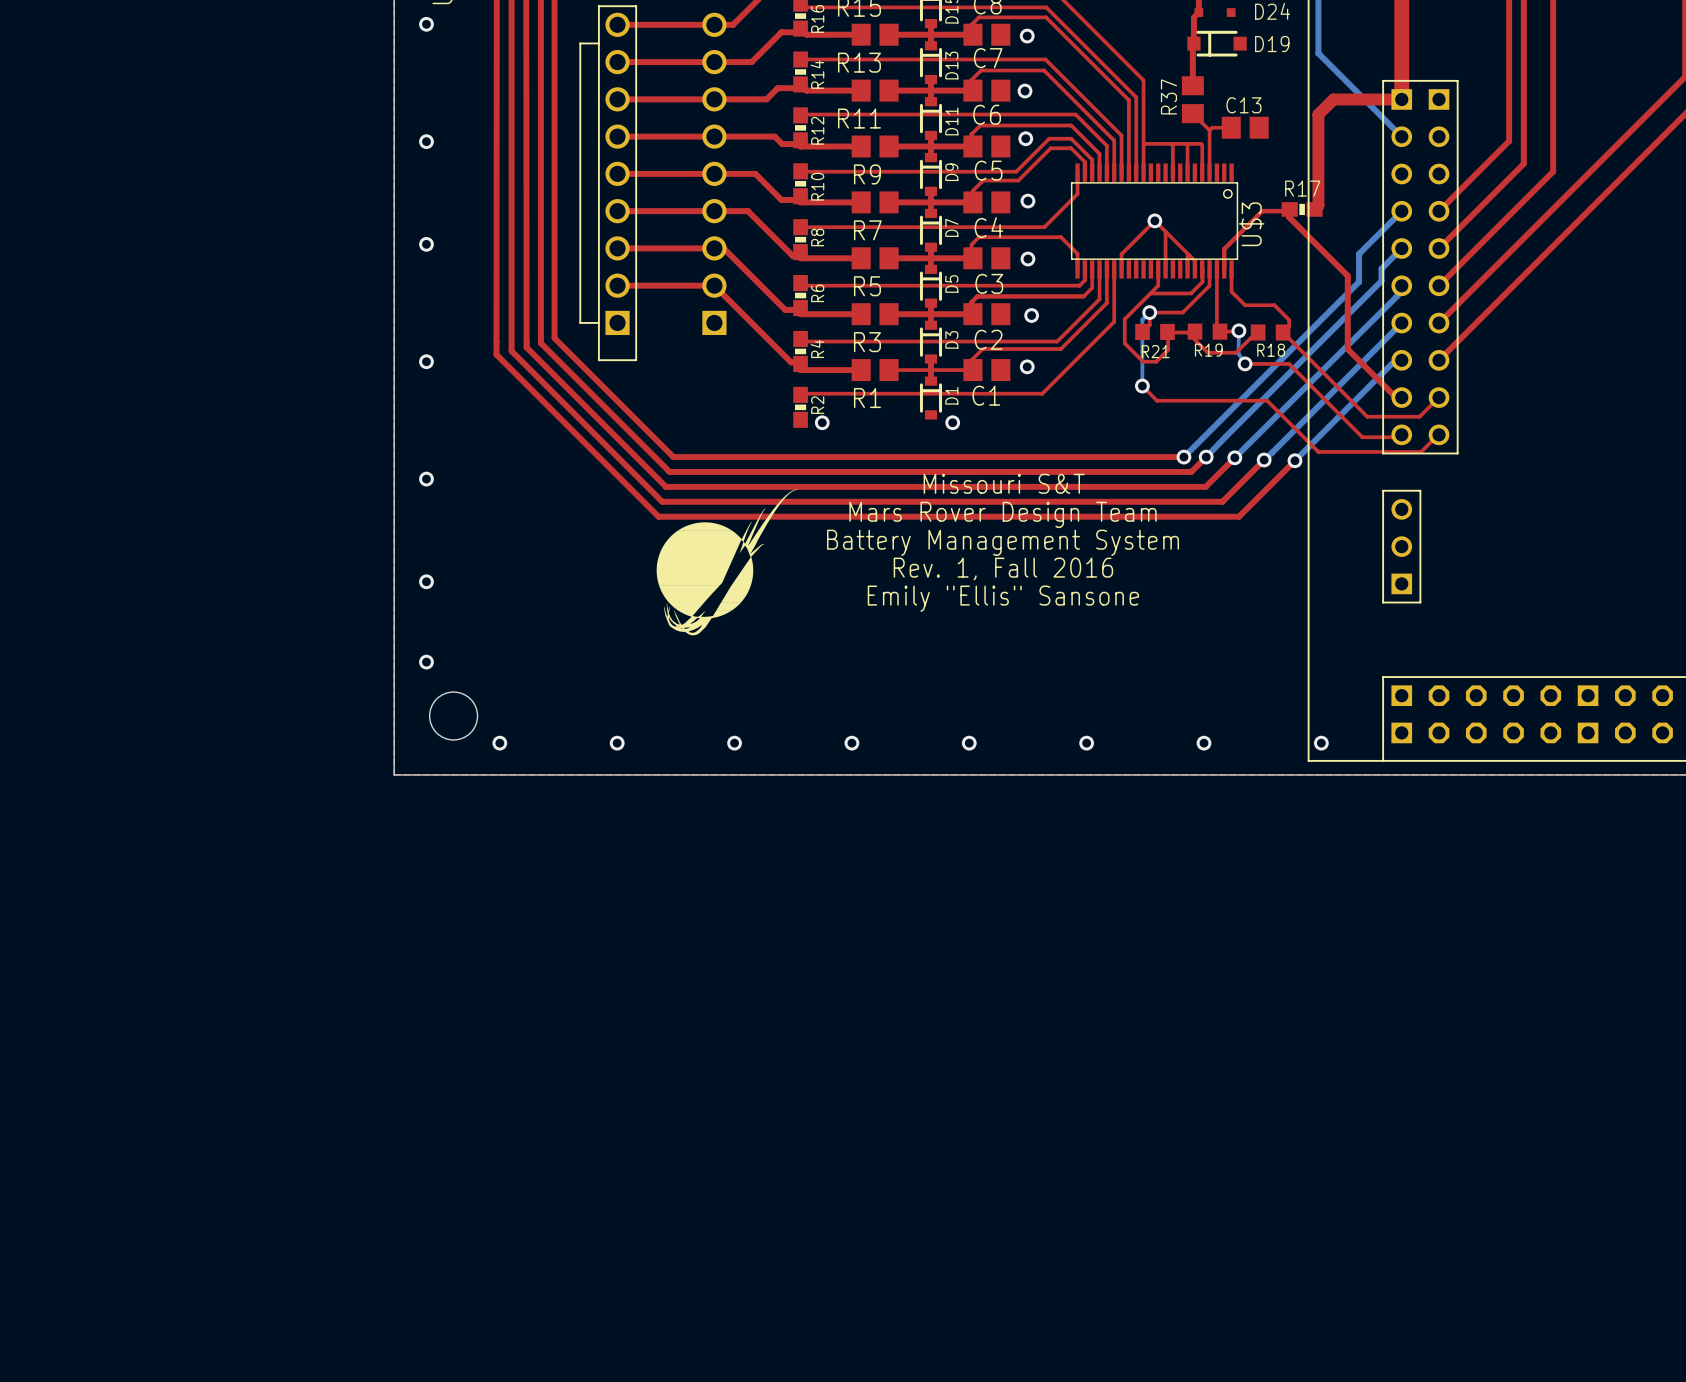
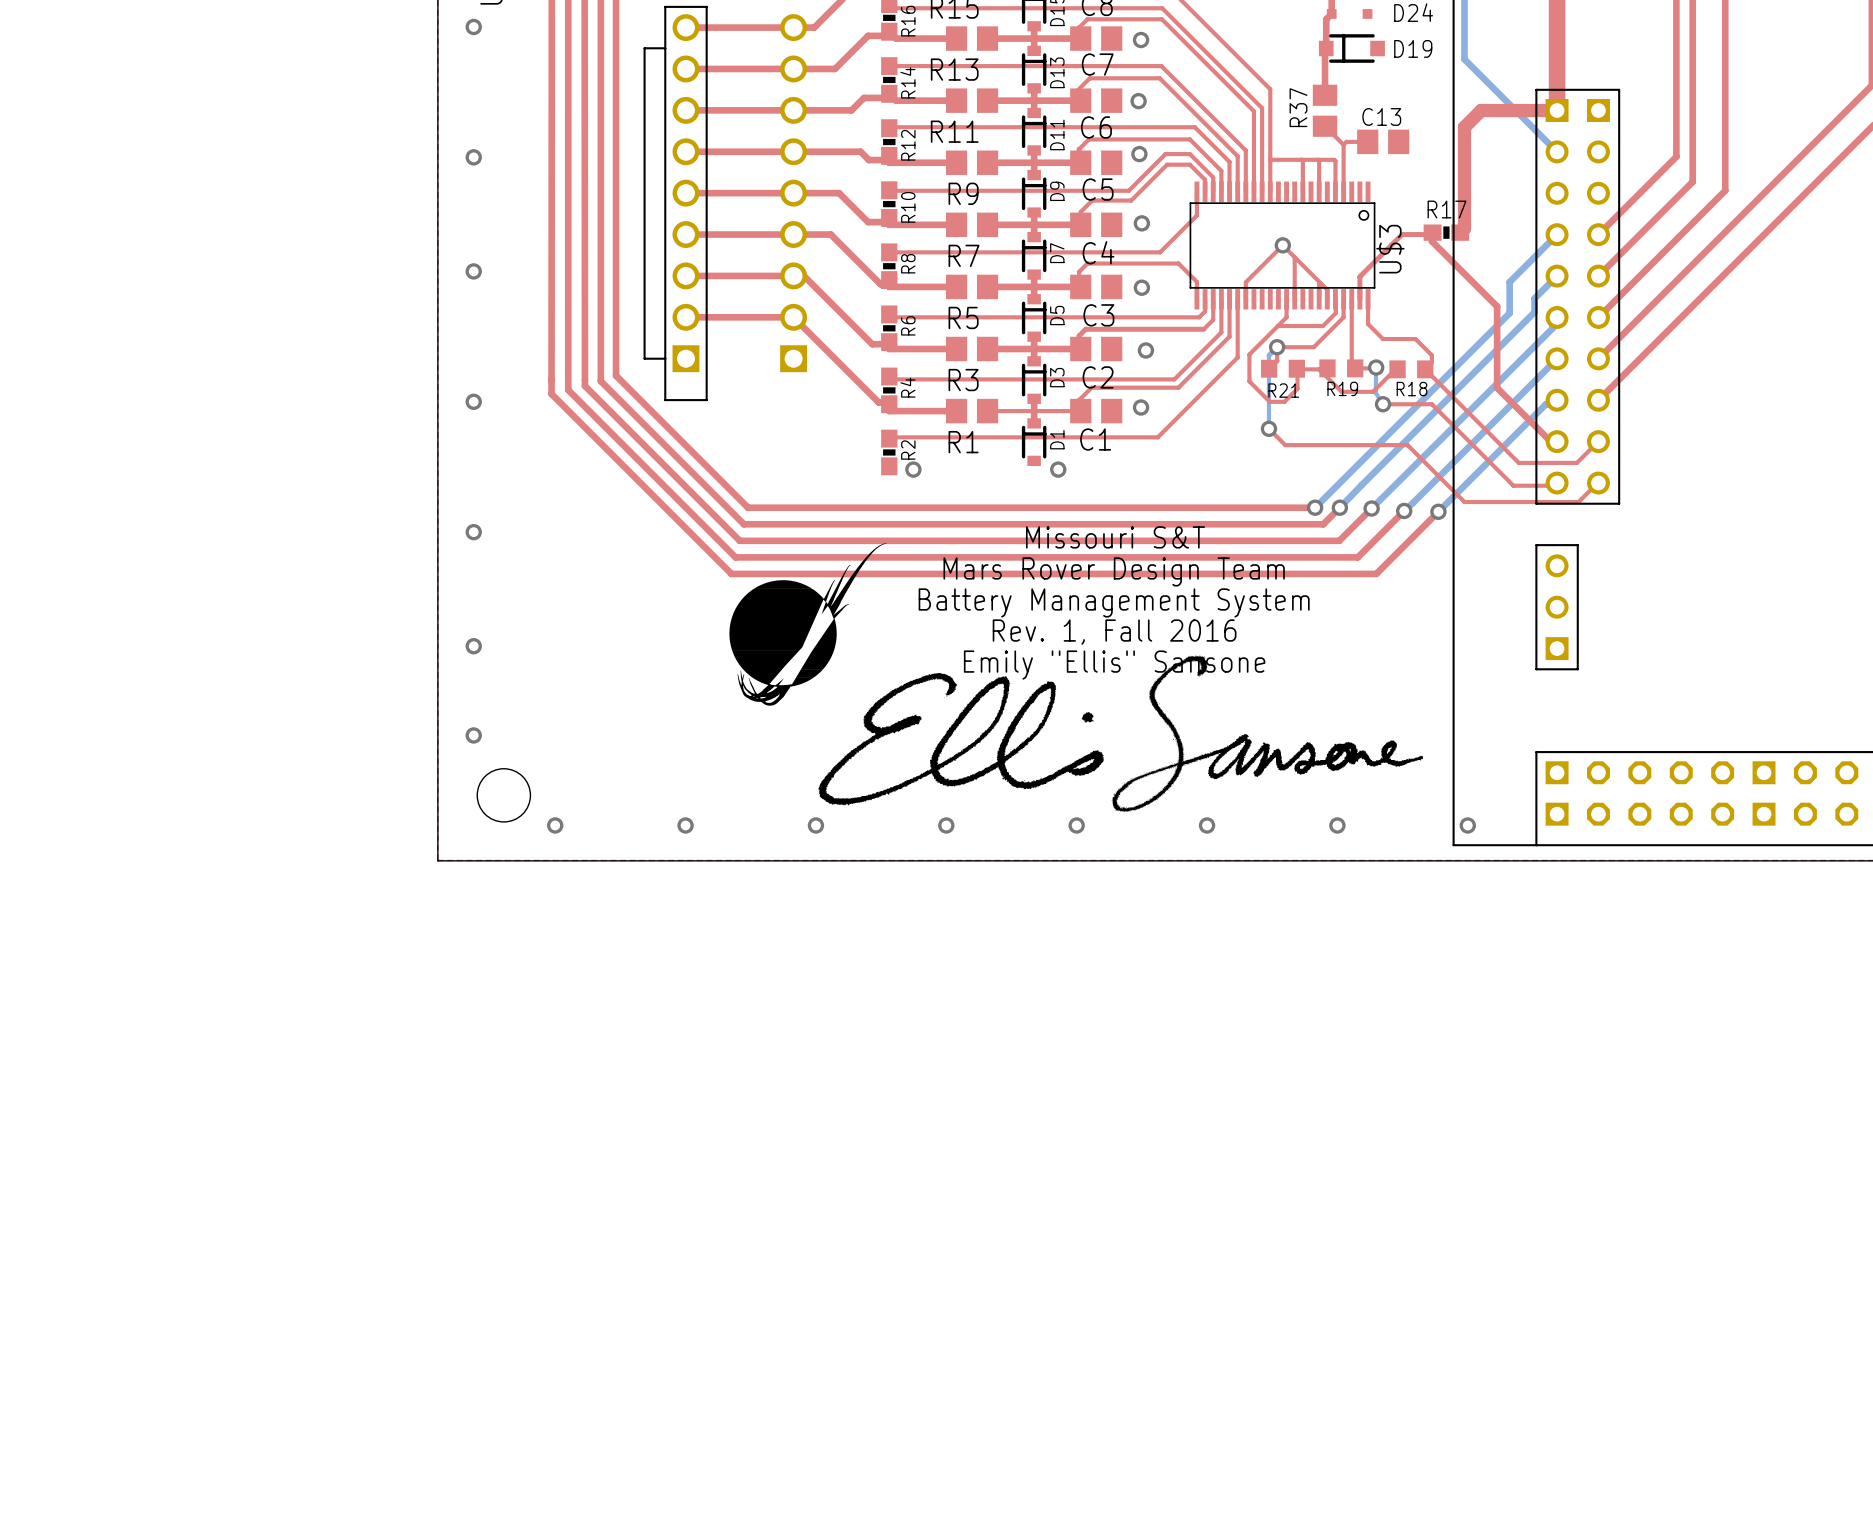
drawing: none -> [818, 655, 1423, 814]

